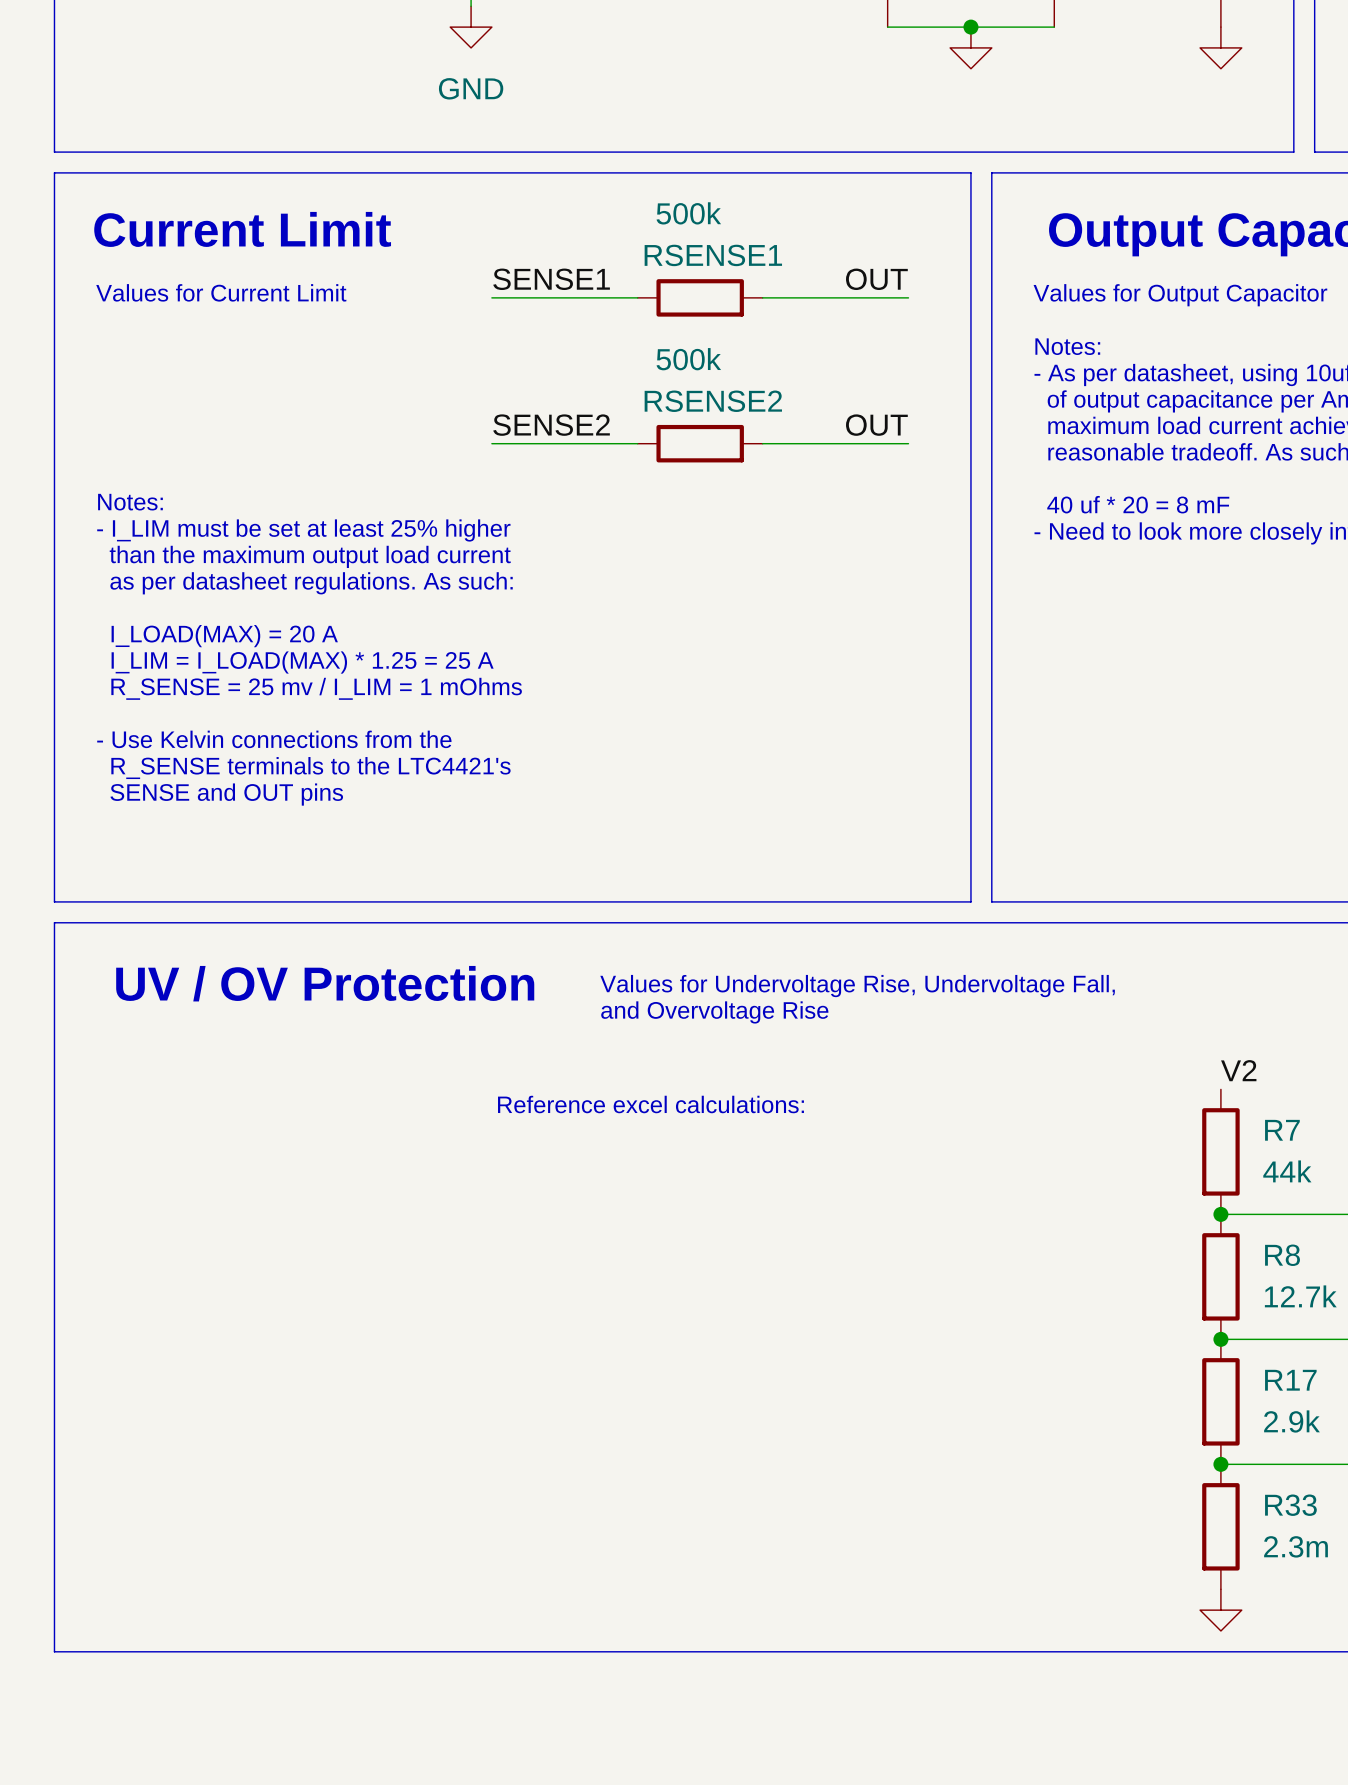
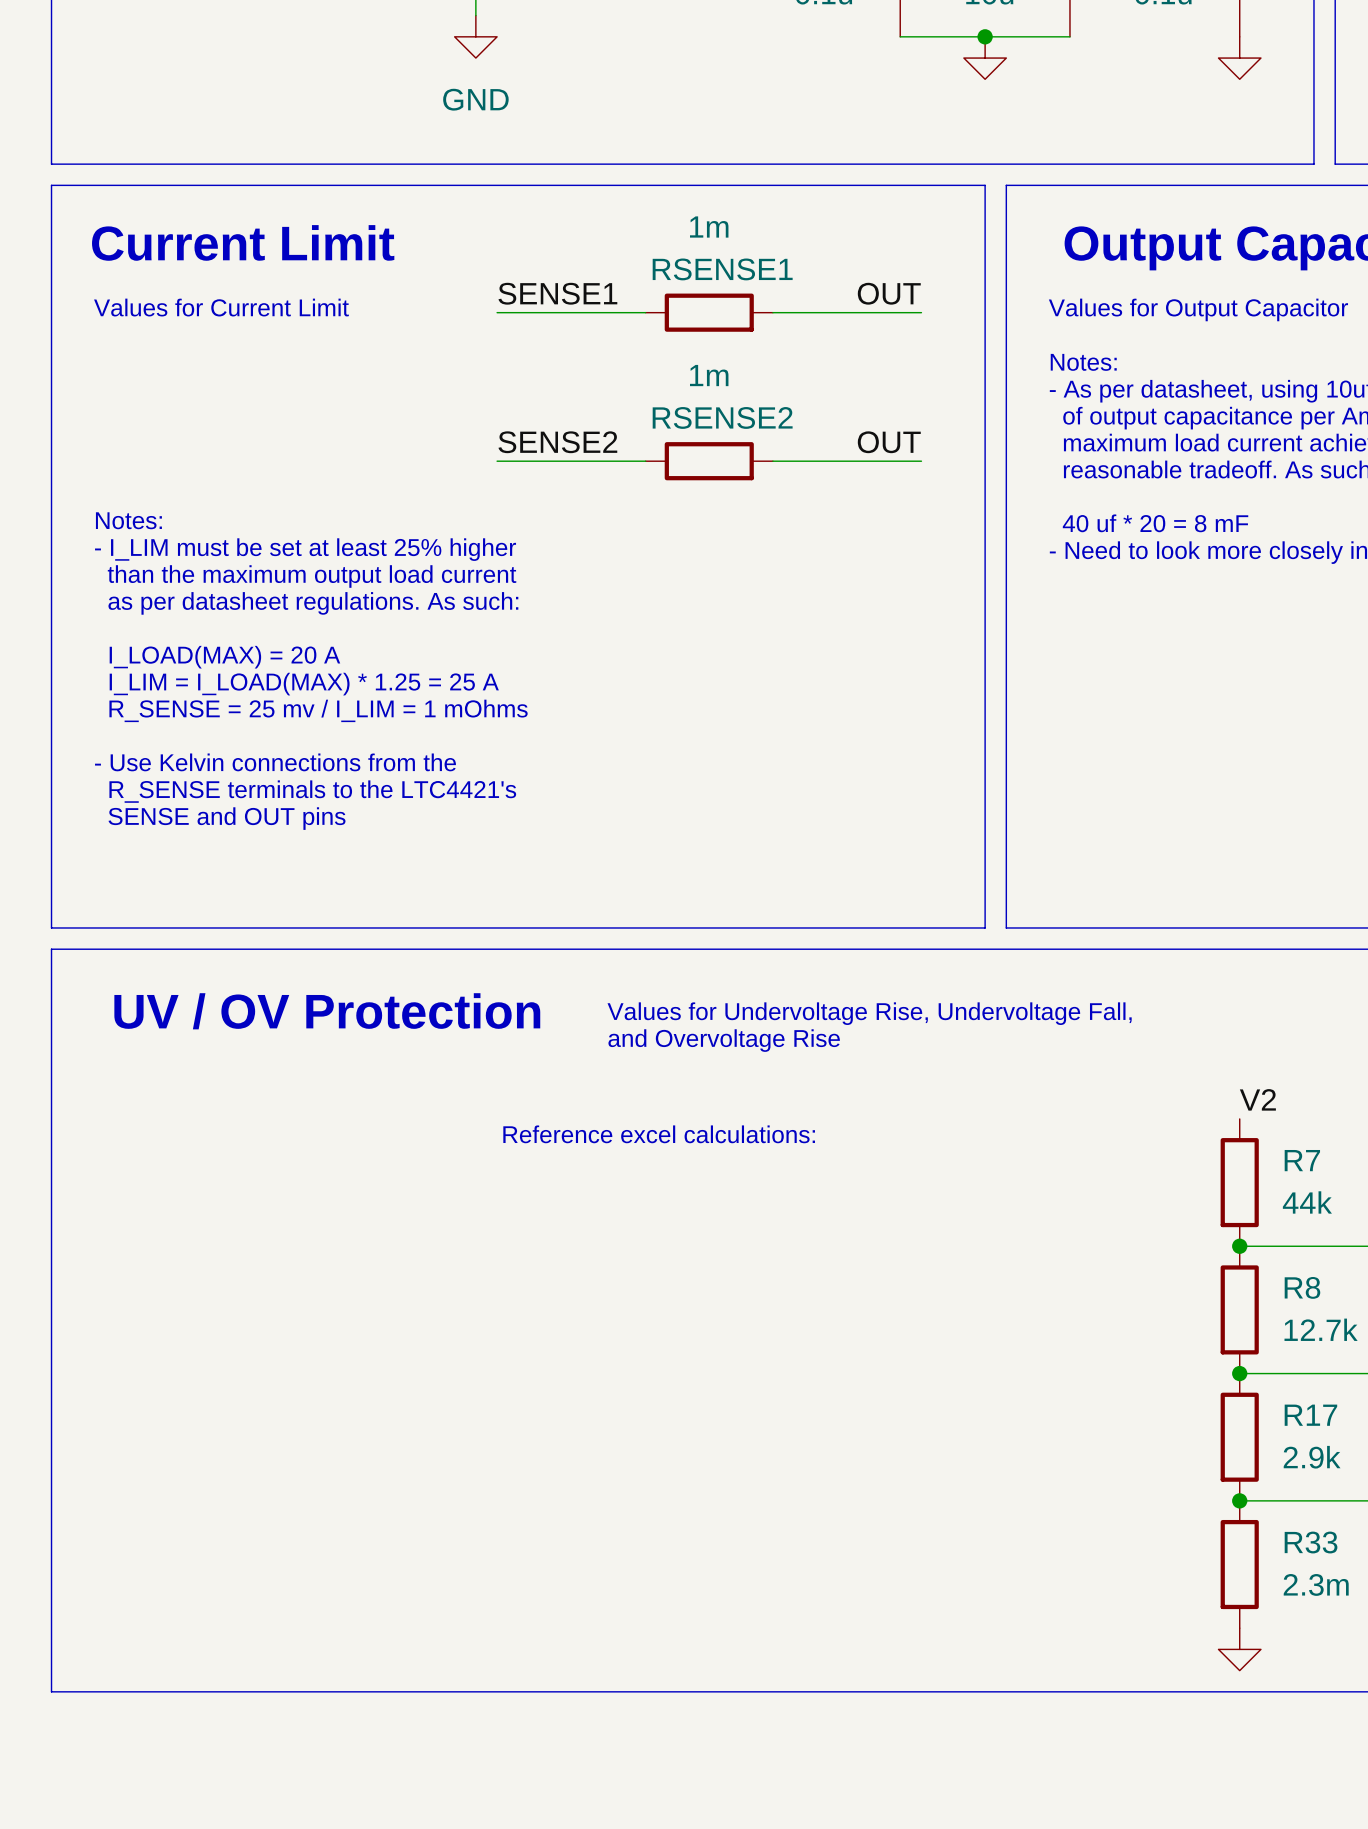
RSENSE1 value: 500k (688, 213) -> 1m (709, 227)
RSENSE2 value: 500k (688, 359) -> 1m (709, 375)

